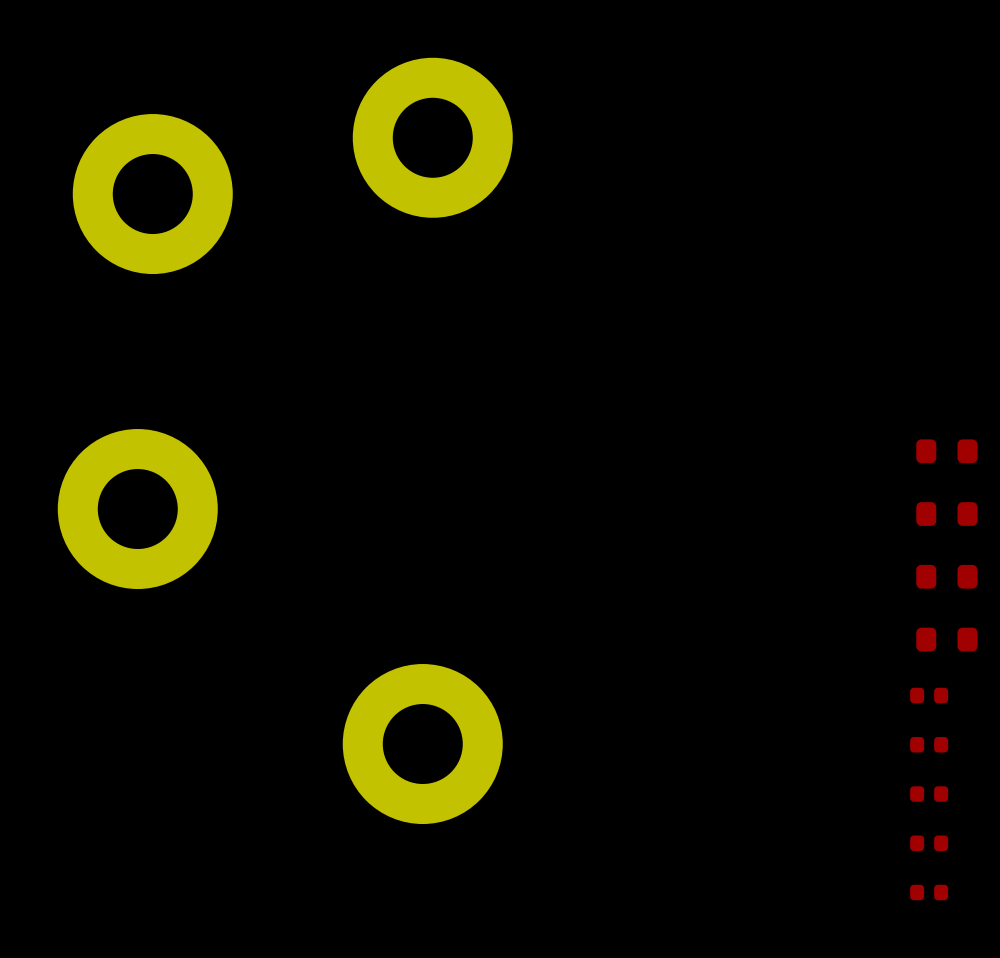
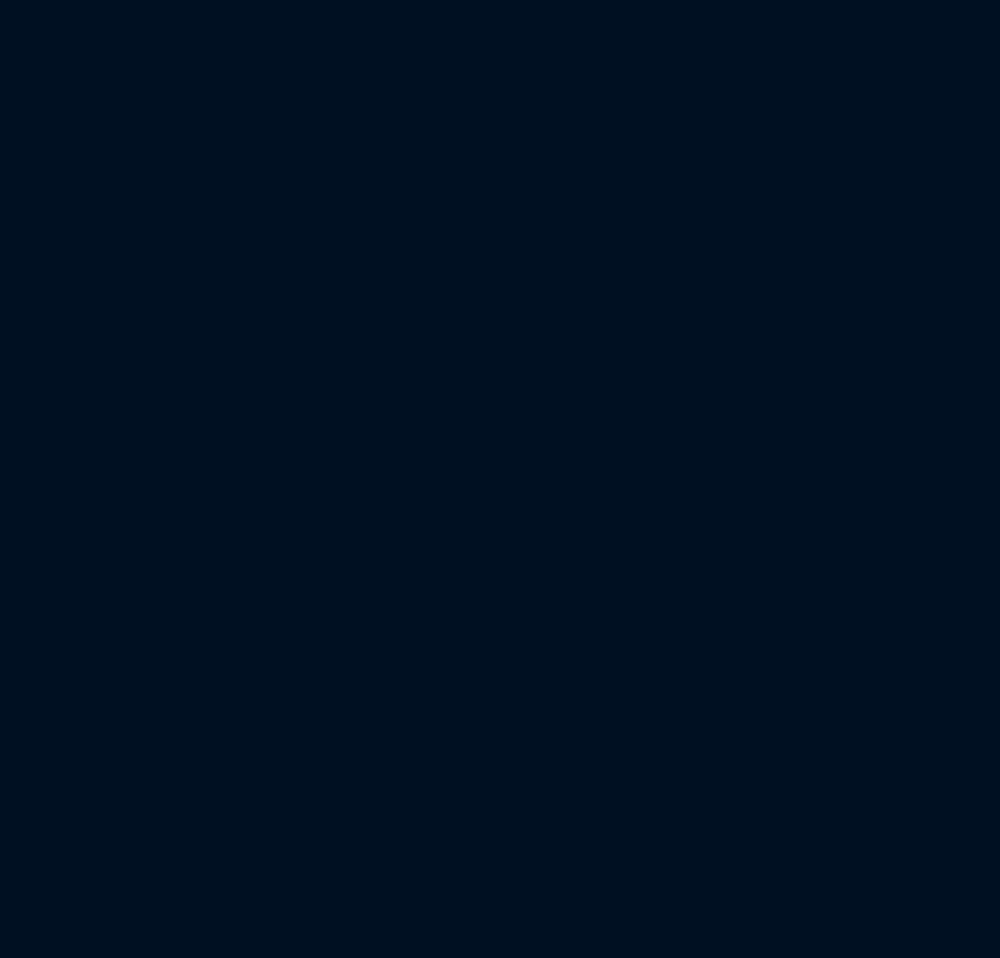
part: (432, 137) -> none
part: (152, 194) -> none
part: (946, 451) -> none
part: (137, 509) -> none
part: (946, 514) -> none
part: (946, 576) -> none
part: (946, 639) -> none
part: (929, 695) -> none
part: (422, 744) -> none
part: (929, 744) -> none
part: (929, 794) -> none
part: (929, 843) -> none
part: (929, 892) -> none

